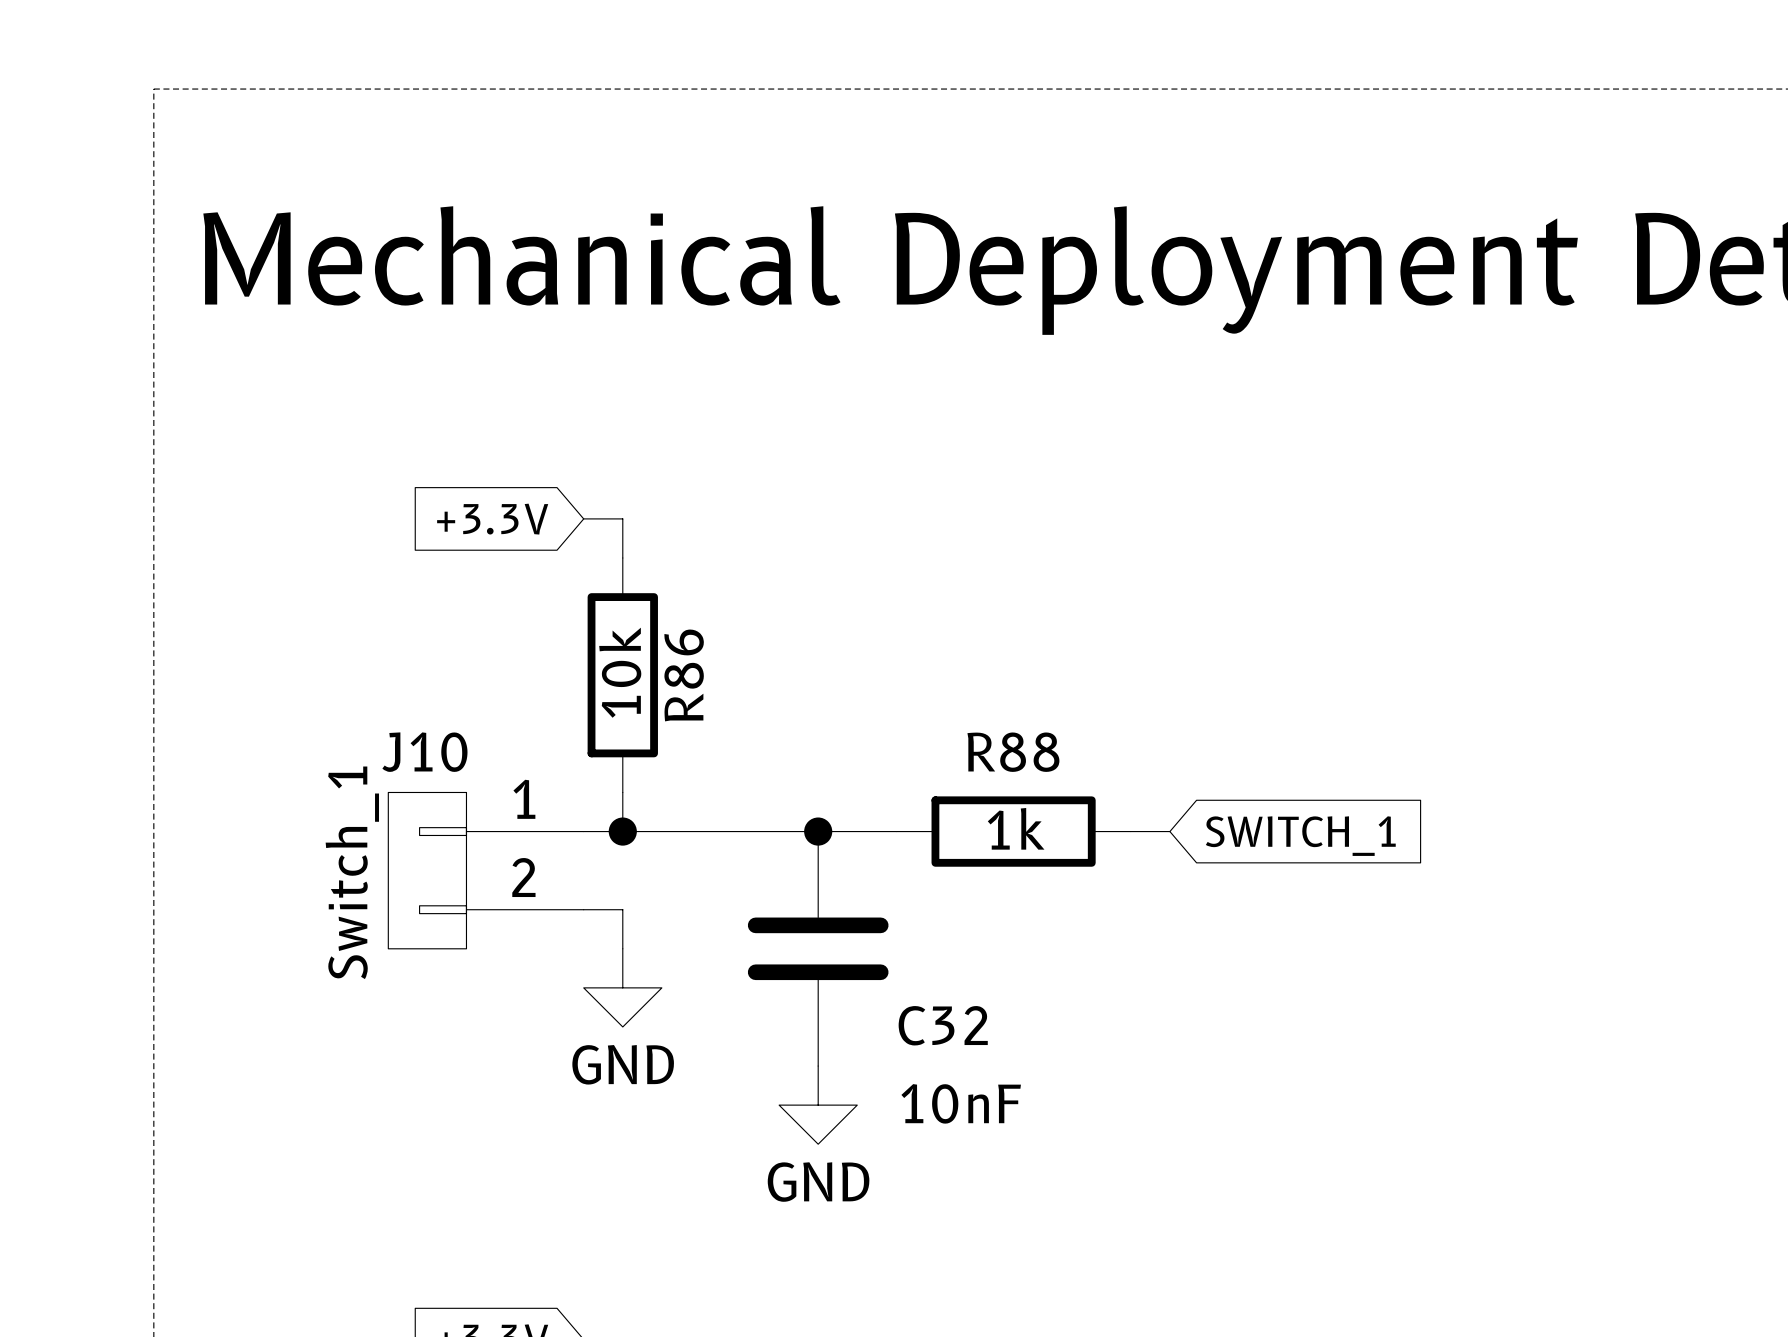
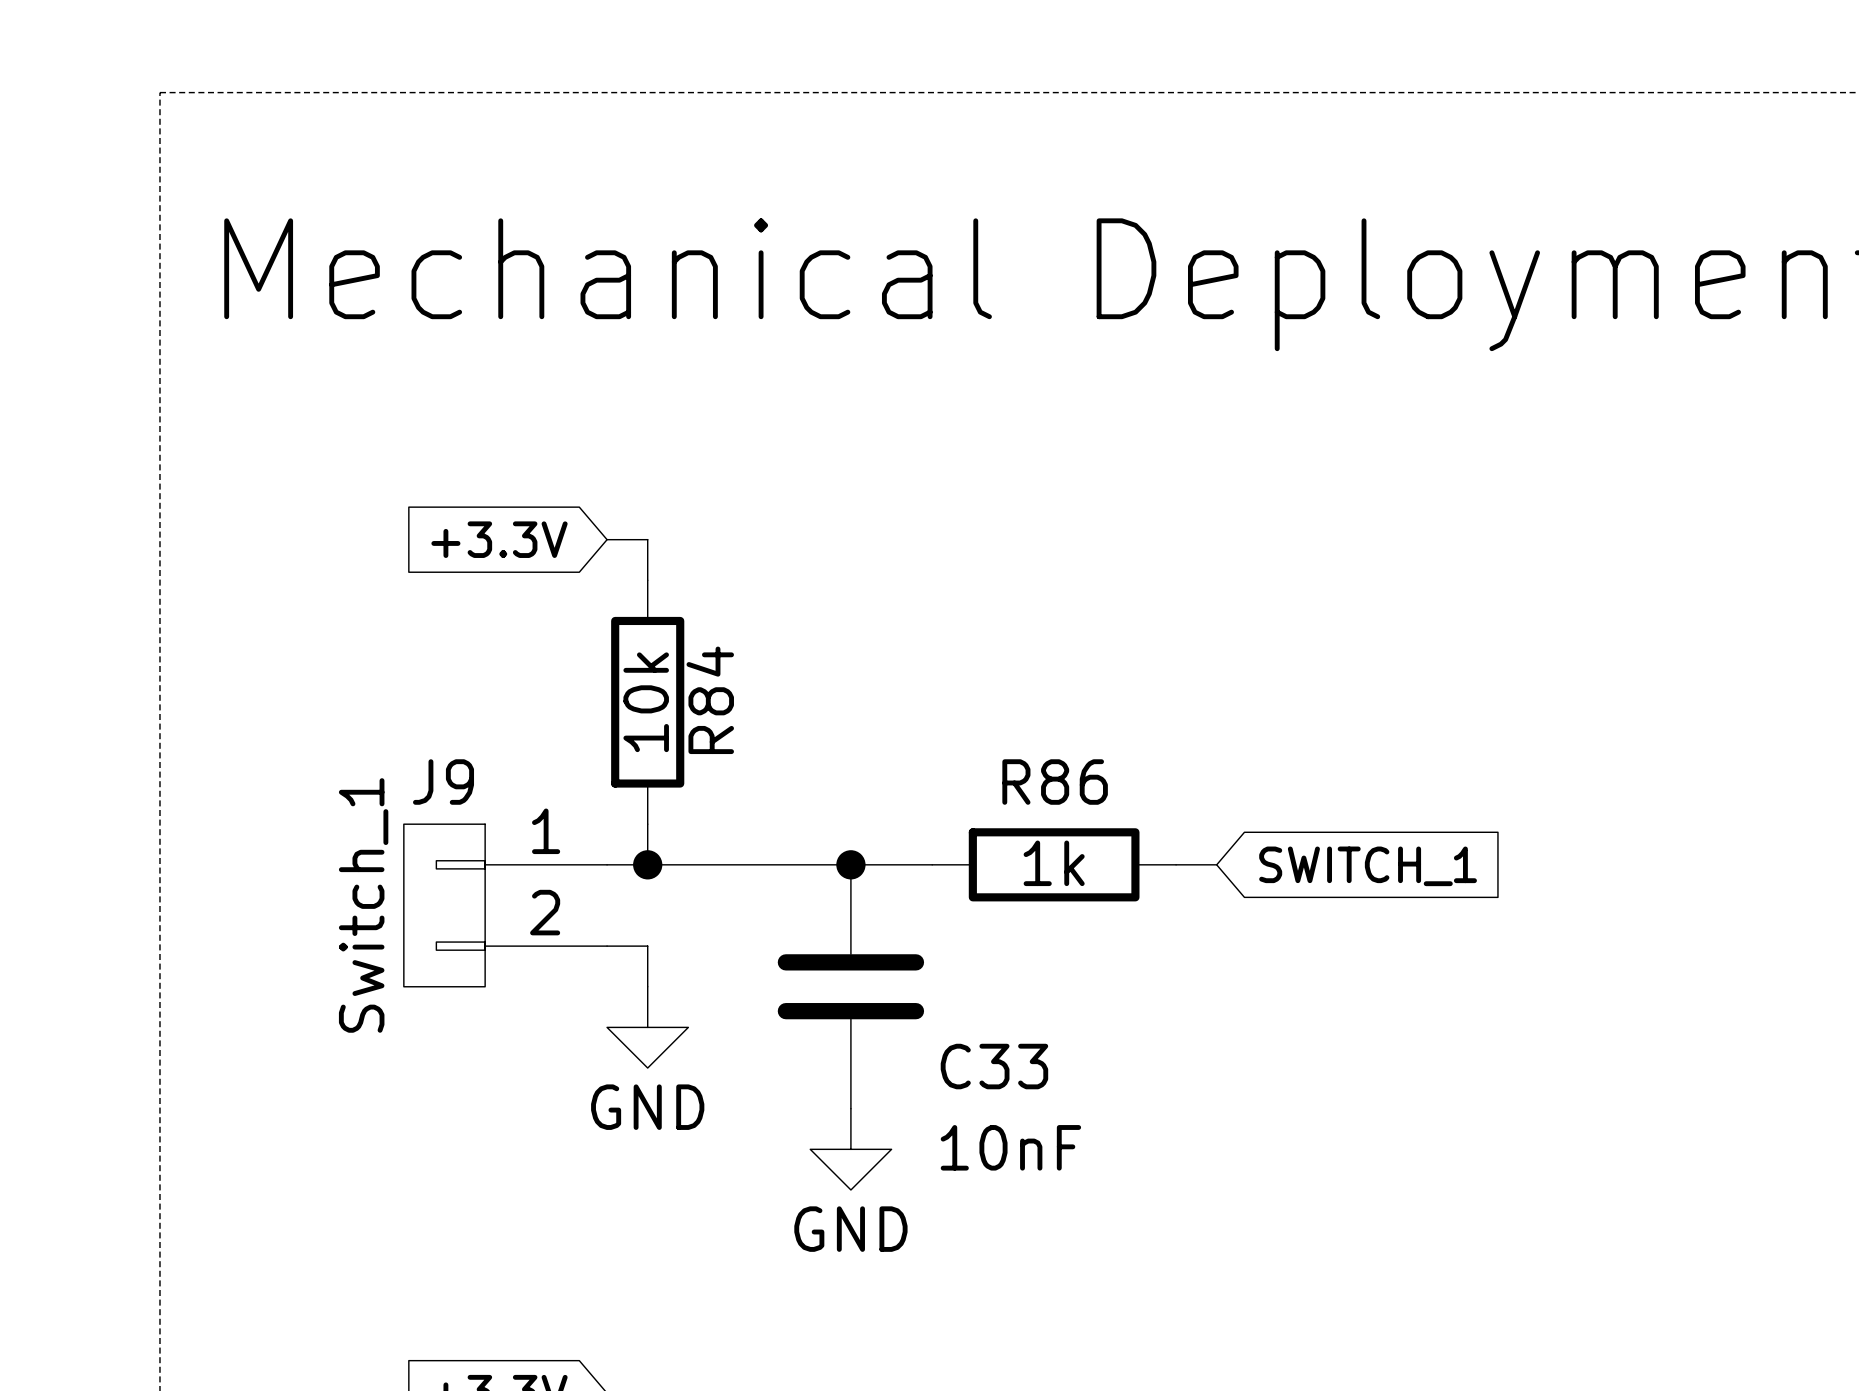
R86 name: R86 (684, 675) -> R84 (710, 700)
J10 name: J10 (424, 752) -> J9 (443, 782)
R88 name: R88 (1013, 752) -> R86 (1055, 782)
C32 name: C32 (943, 1025) -> C33 (994, 1066)

